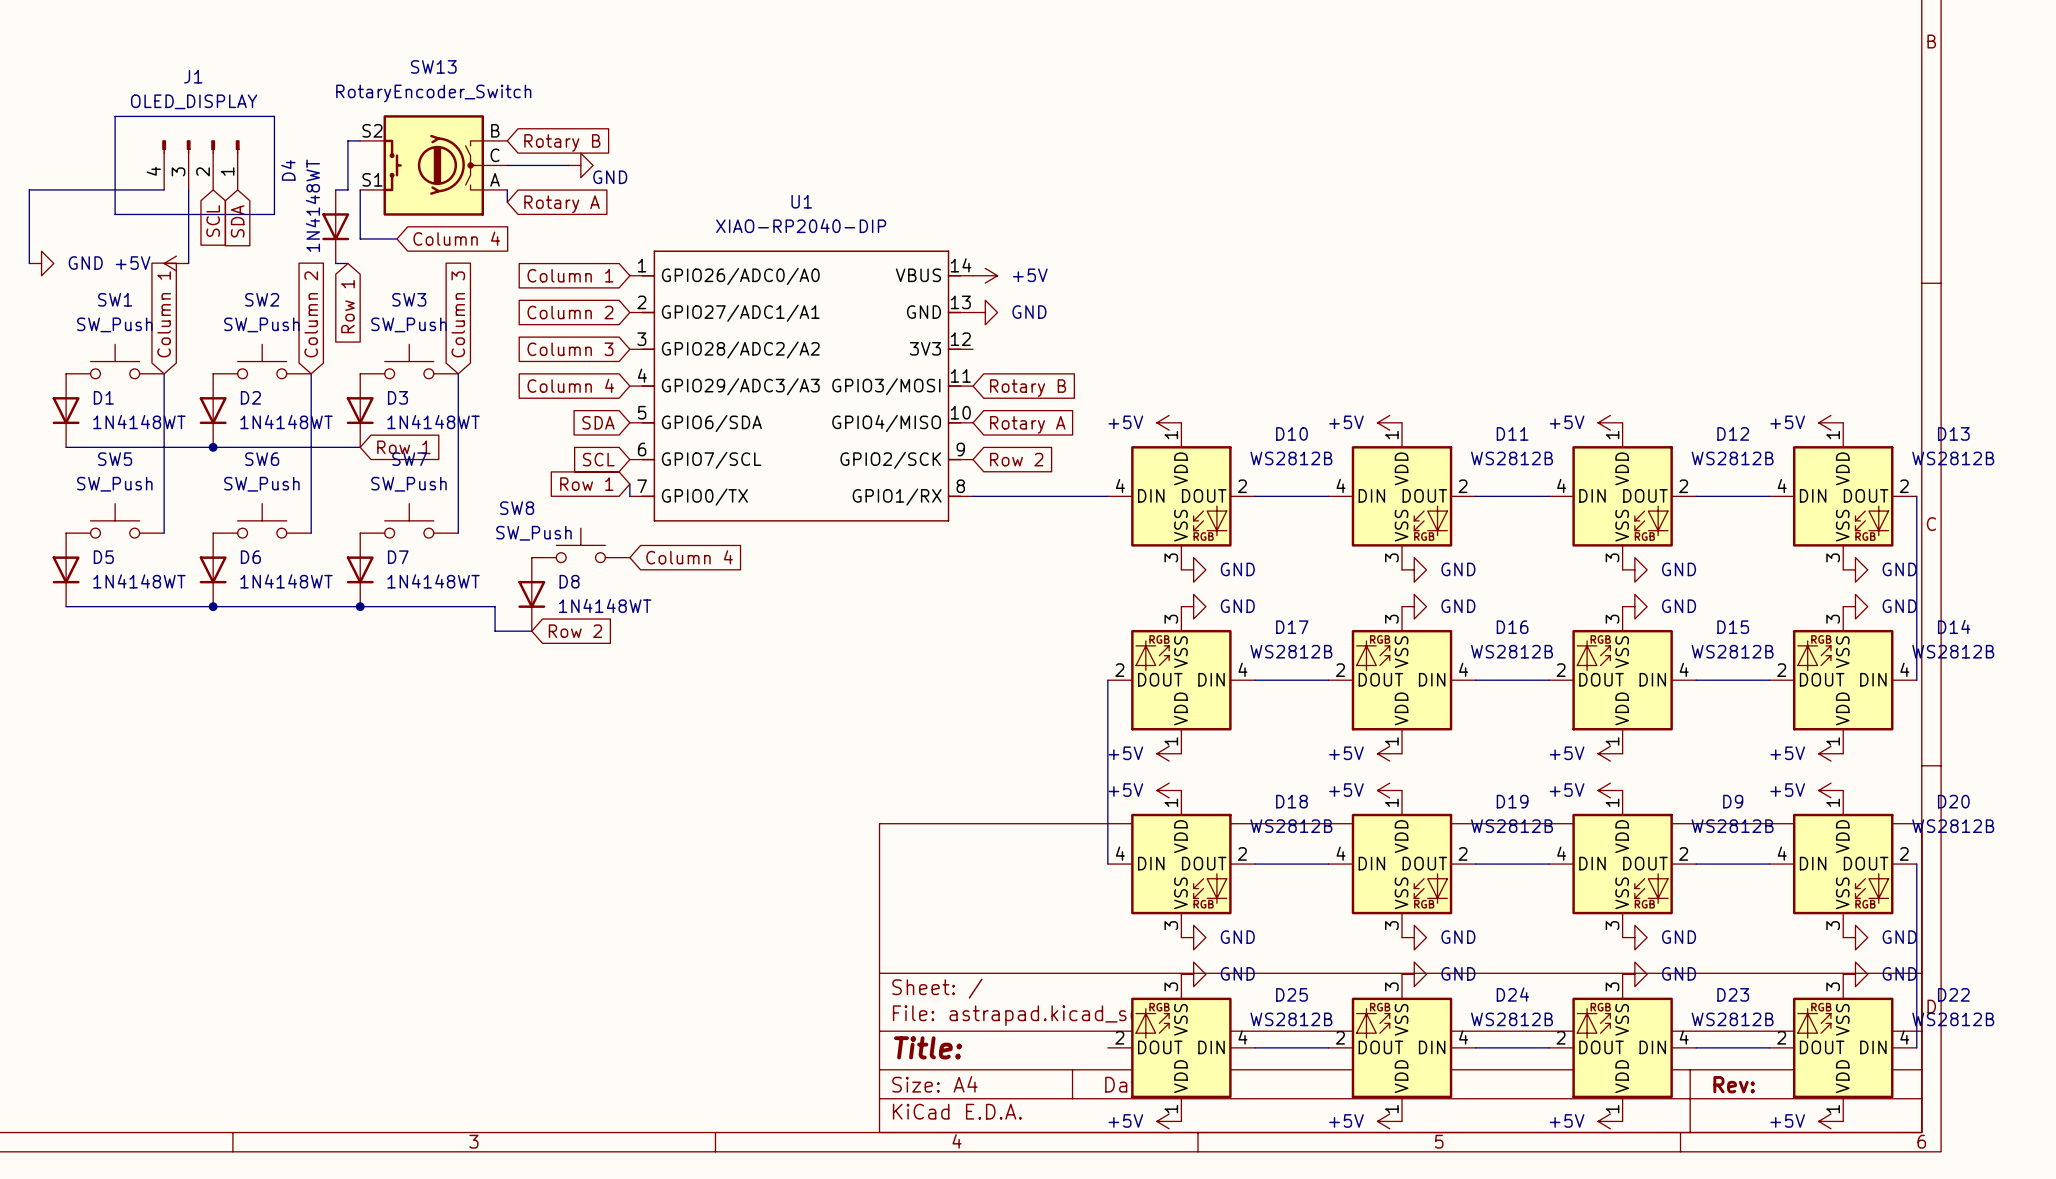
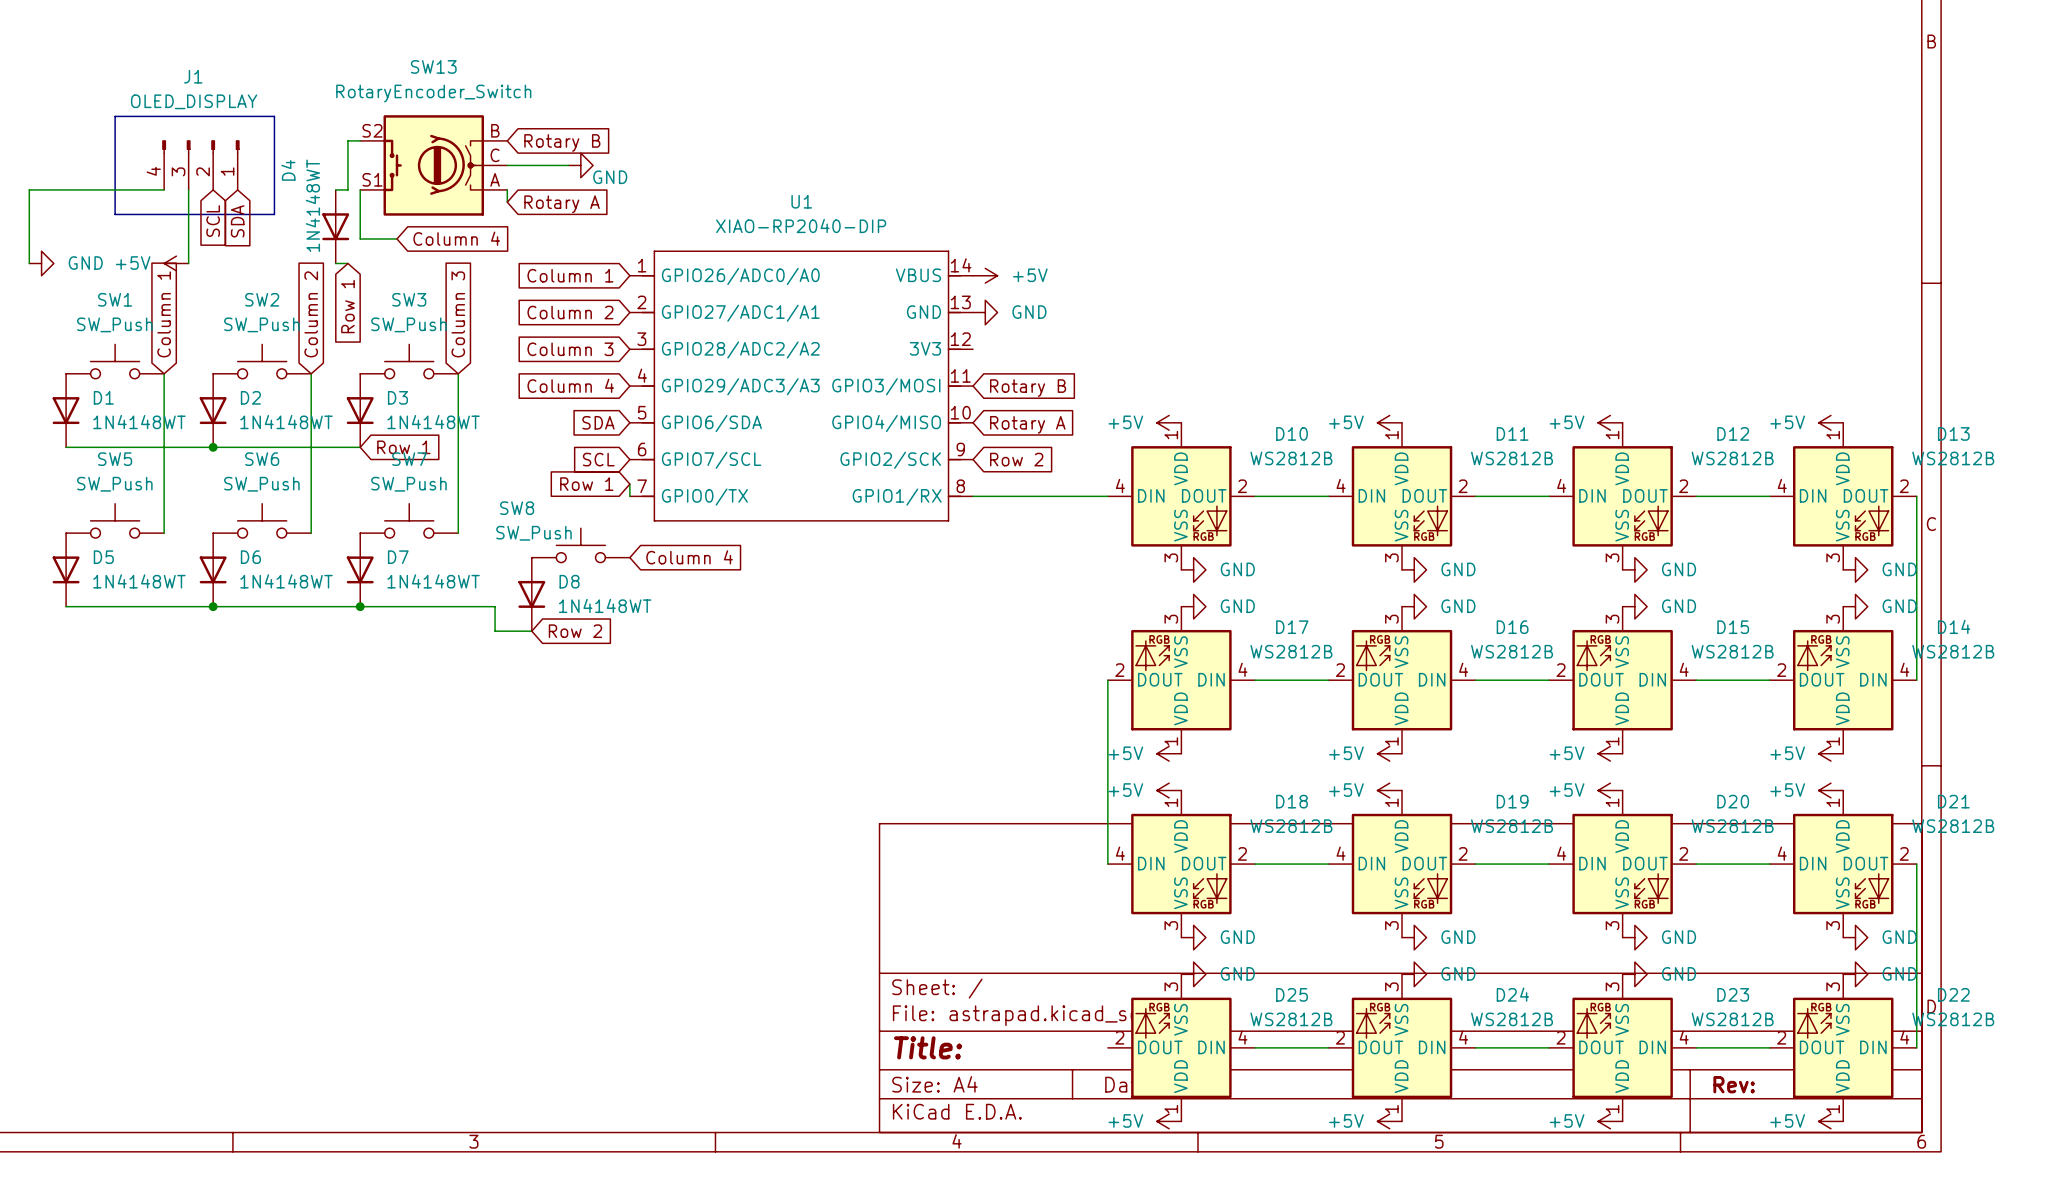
D9 name: D9 (1733, 801) -> D20 (1733, 801)
D20 name: D20 (1953, 801) -> D21 (1953, 801)

